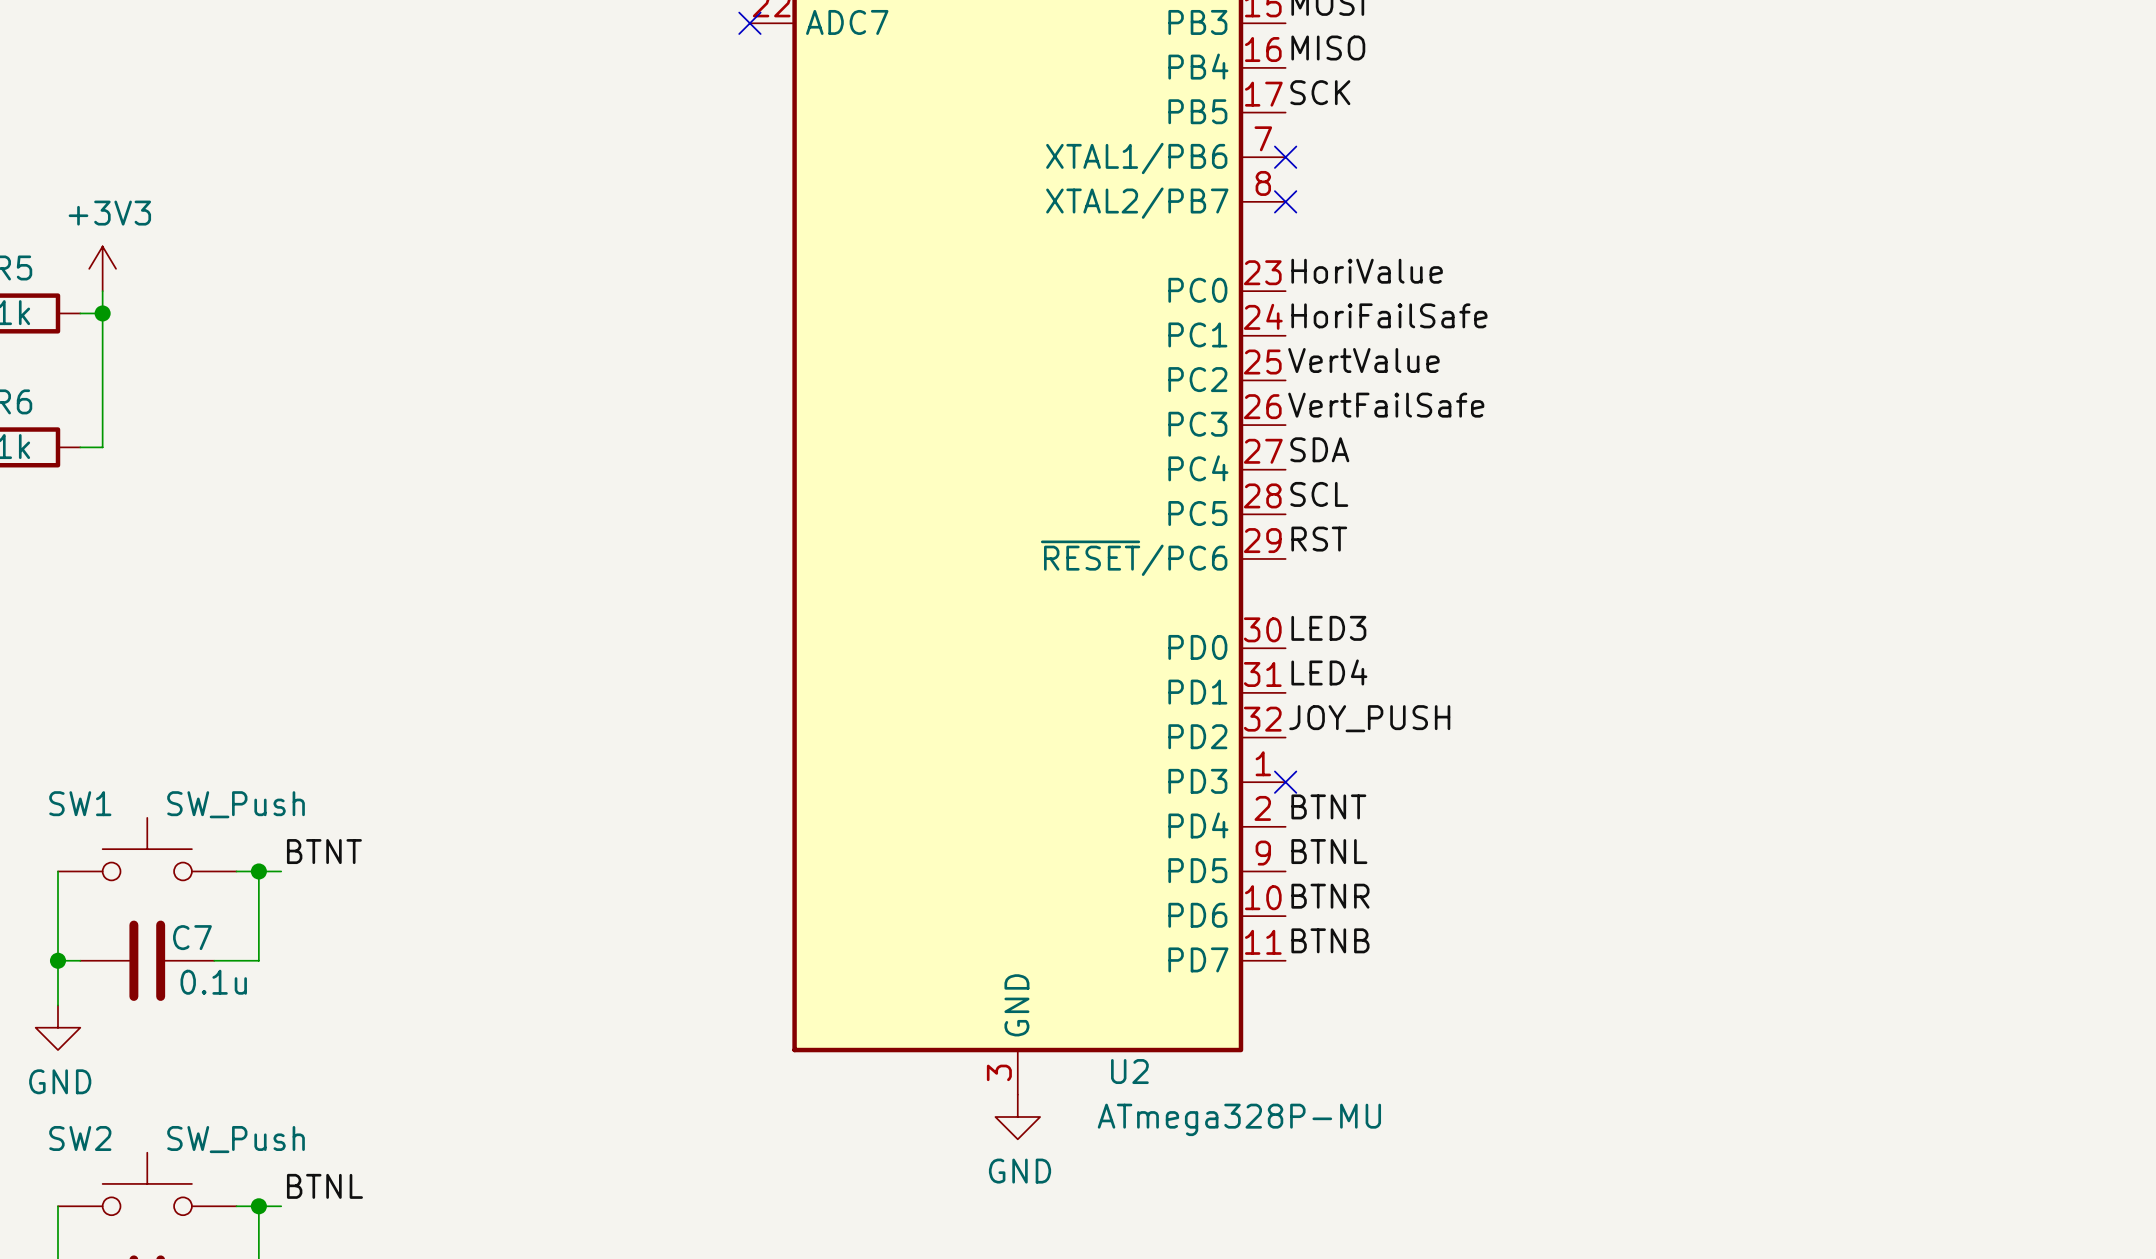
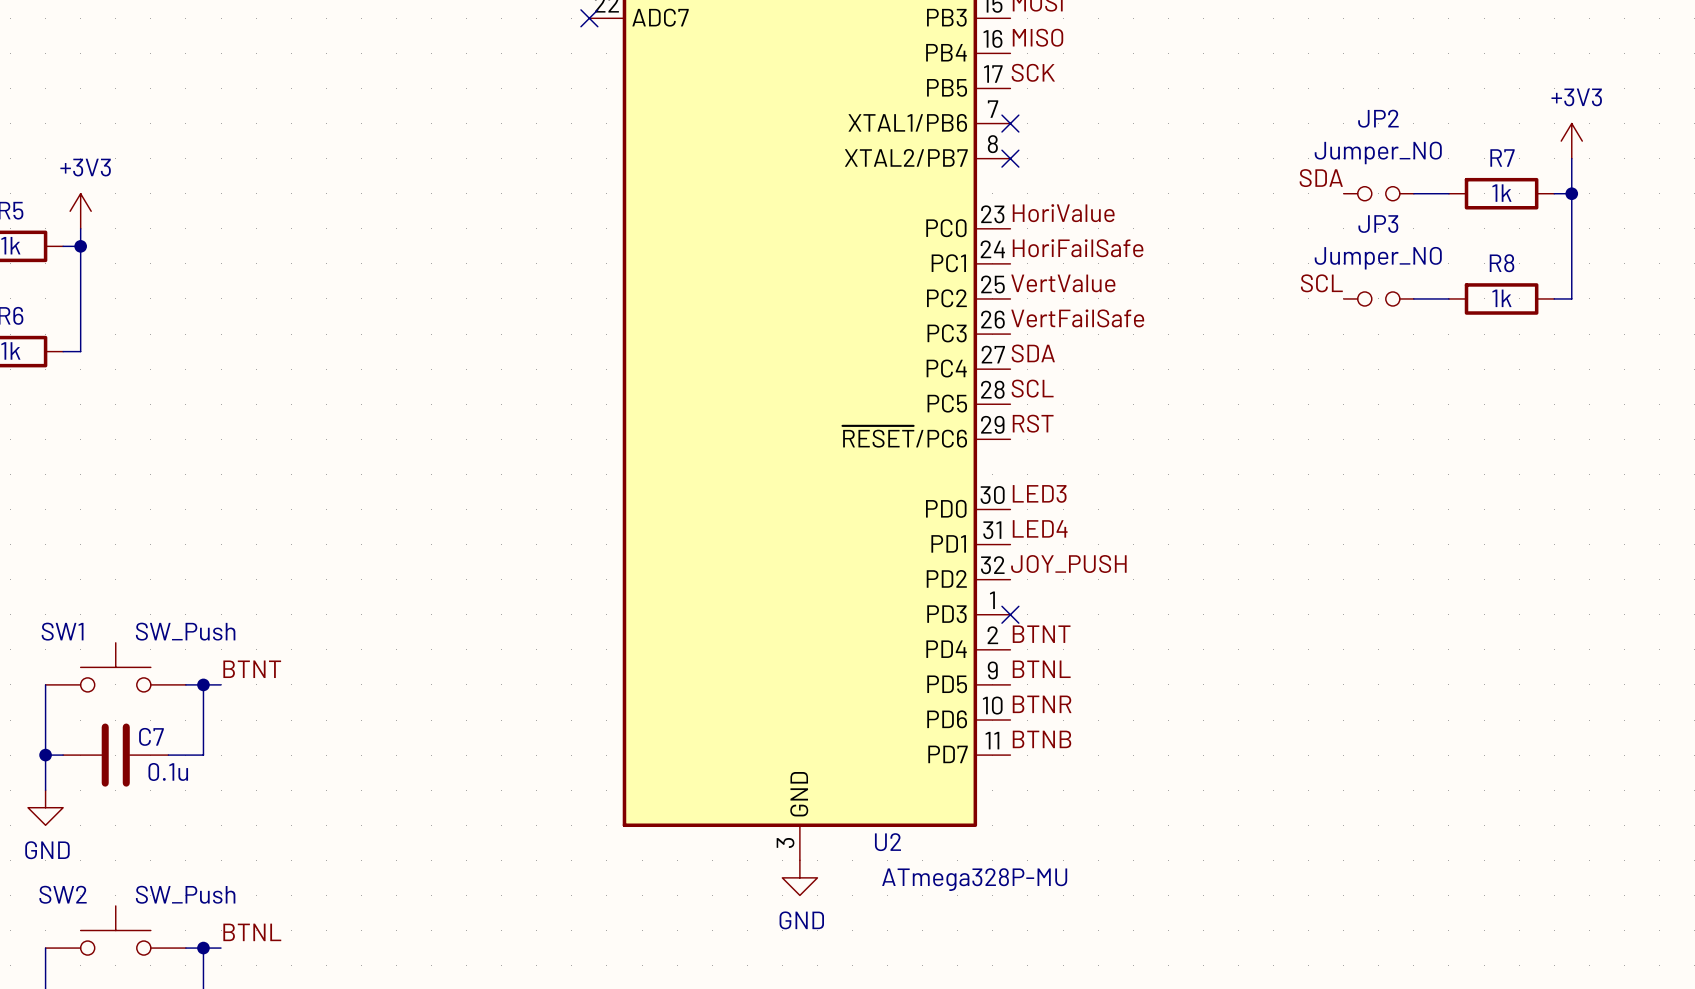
power symbol: none -> +3V3 (1571, 141)
wire: none -> (1571, 158) (1571, 298) (1554, 298)
label: none -> SDA (1321, 178)
JP2: none -> Jumper_NO (1378, 193)
wire: none -> (1413, 193) (1448, 193)
R7: none -> 1k (1501, 193)
wire: none -> (1554, 193) (1571, 193)
junction: none -> (1571, 193)
label: none -> SCL (1321, 283)
JP3: none -> Jumper_NO (1378, 298)
wire: none -> (1413, 298) (1448, 298)
R8: none -> 1k (1501, 298)

